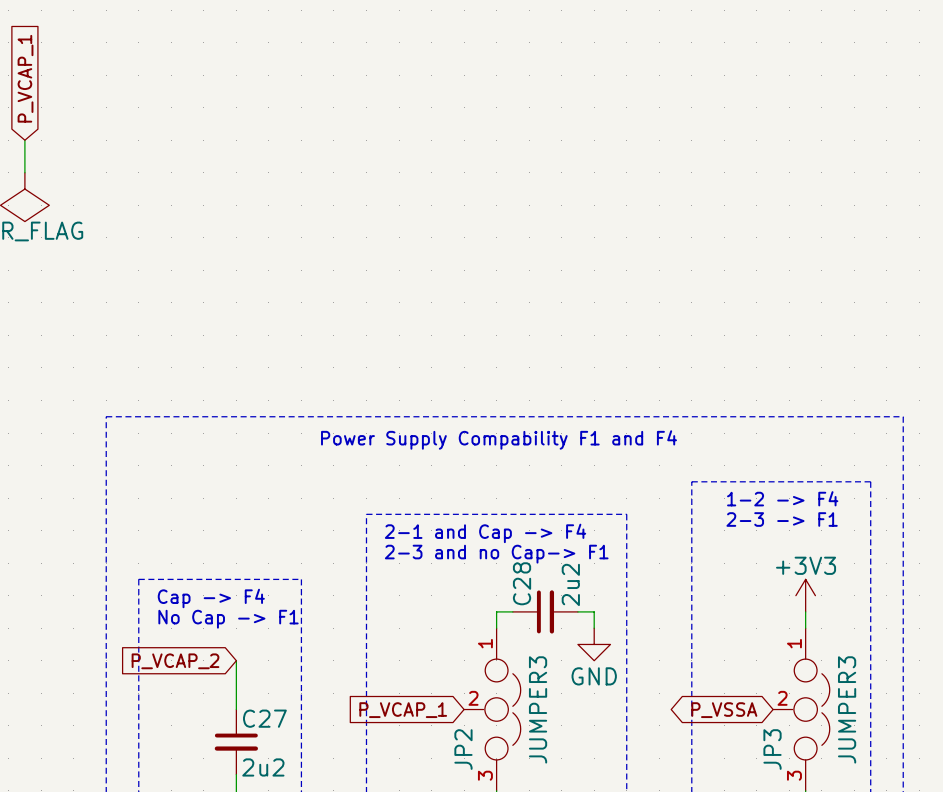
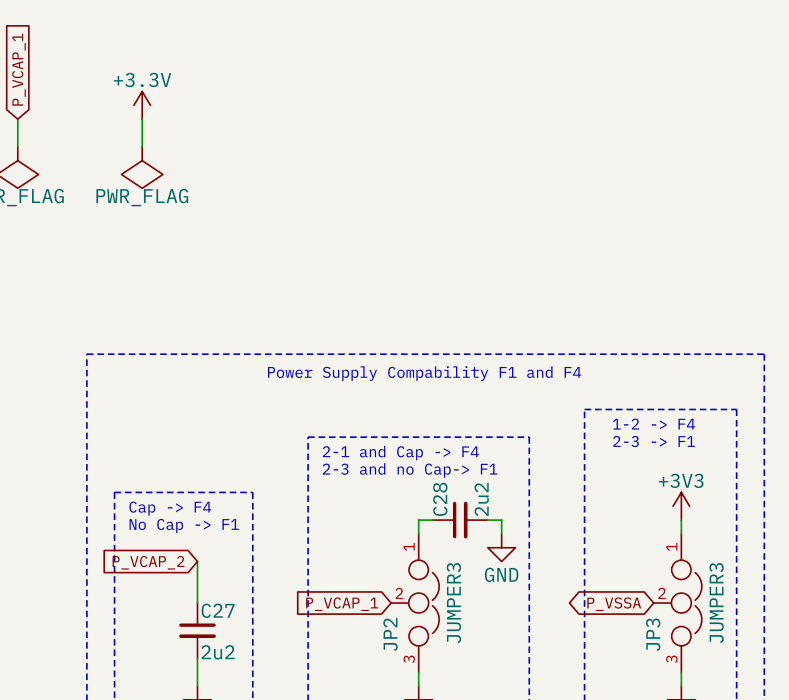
power symbol: none -> +3.3V (142, 105)
wire: none -> (142, 119) (142, 146)
power symbol: none -> PWR_FLAG (142, 167)

